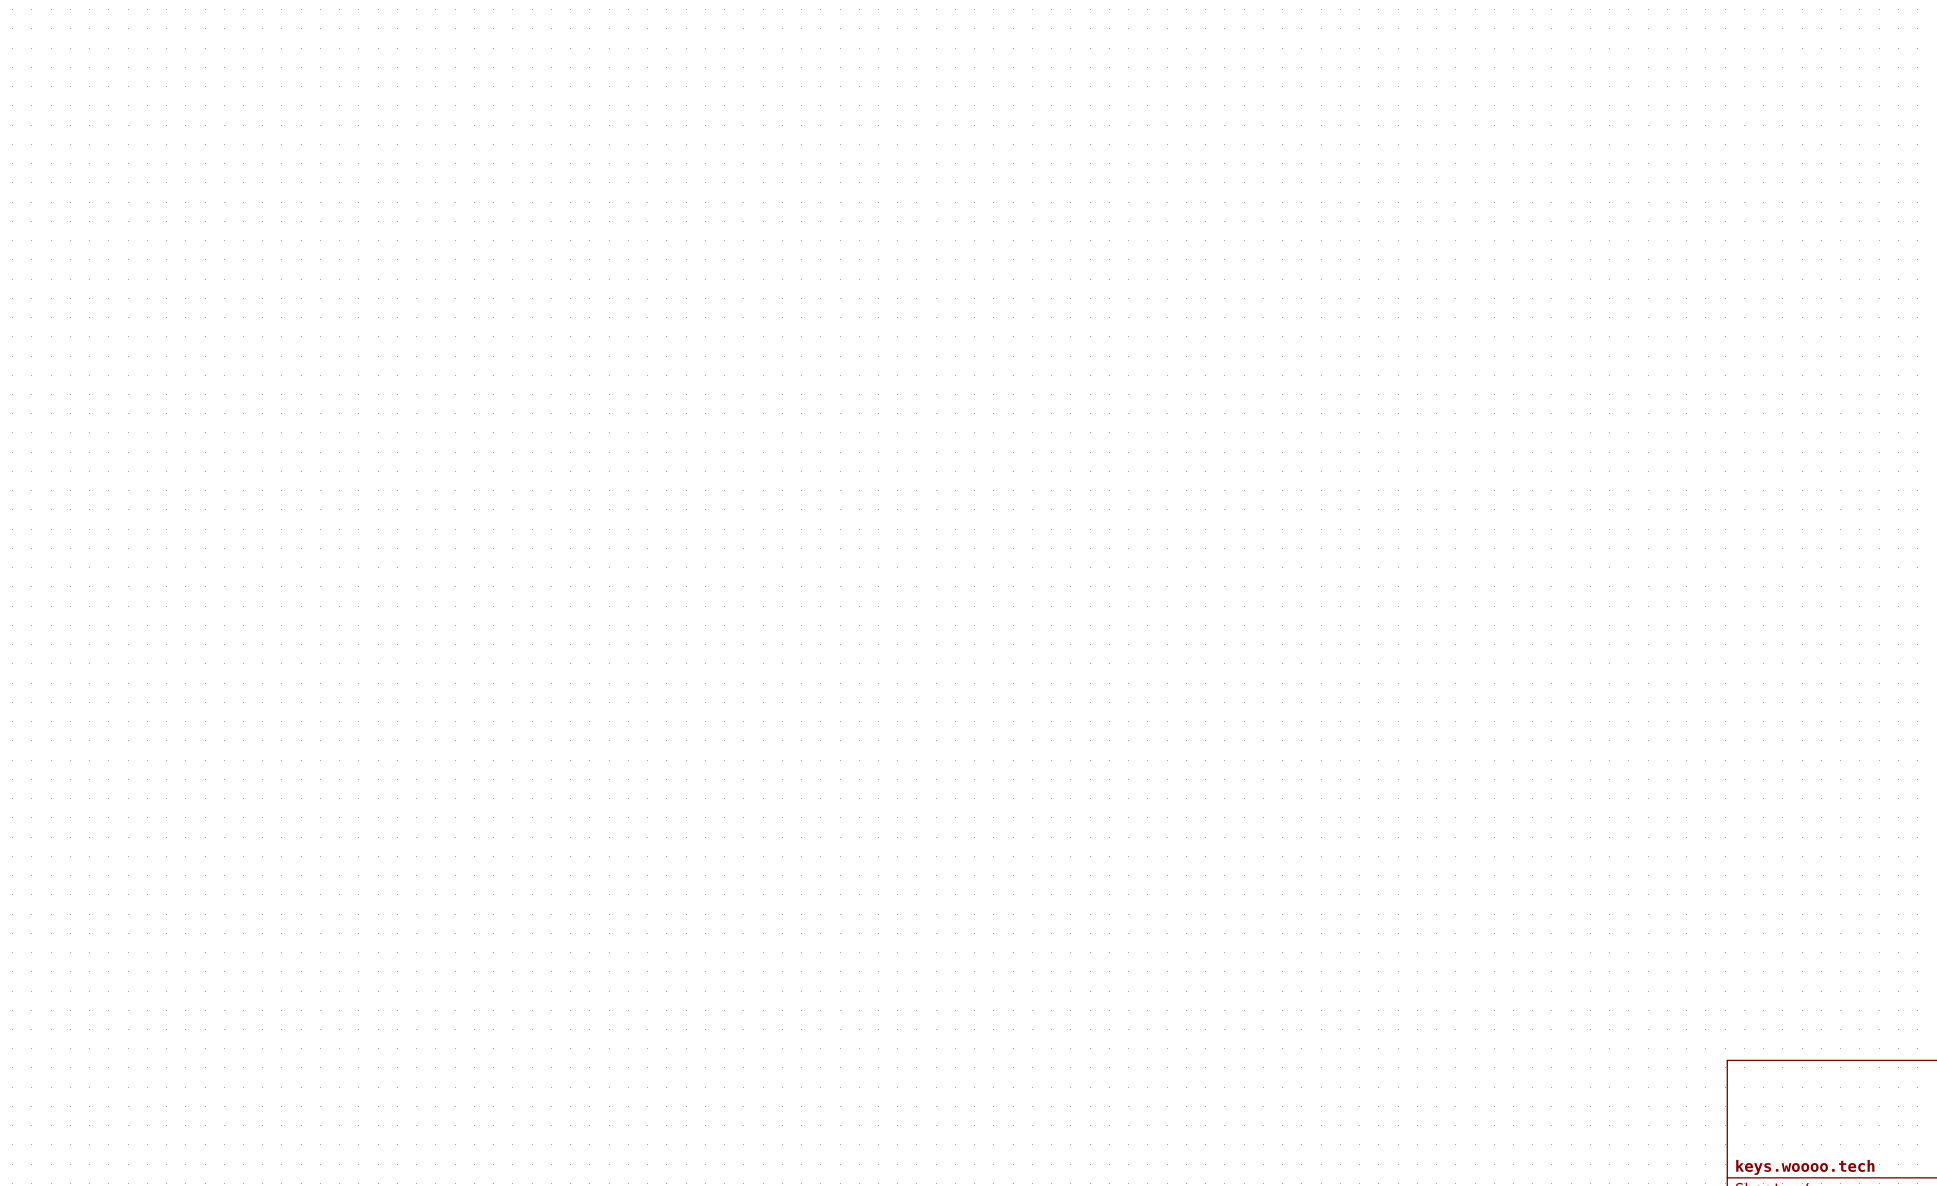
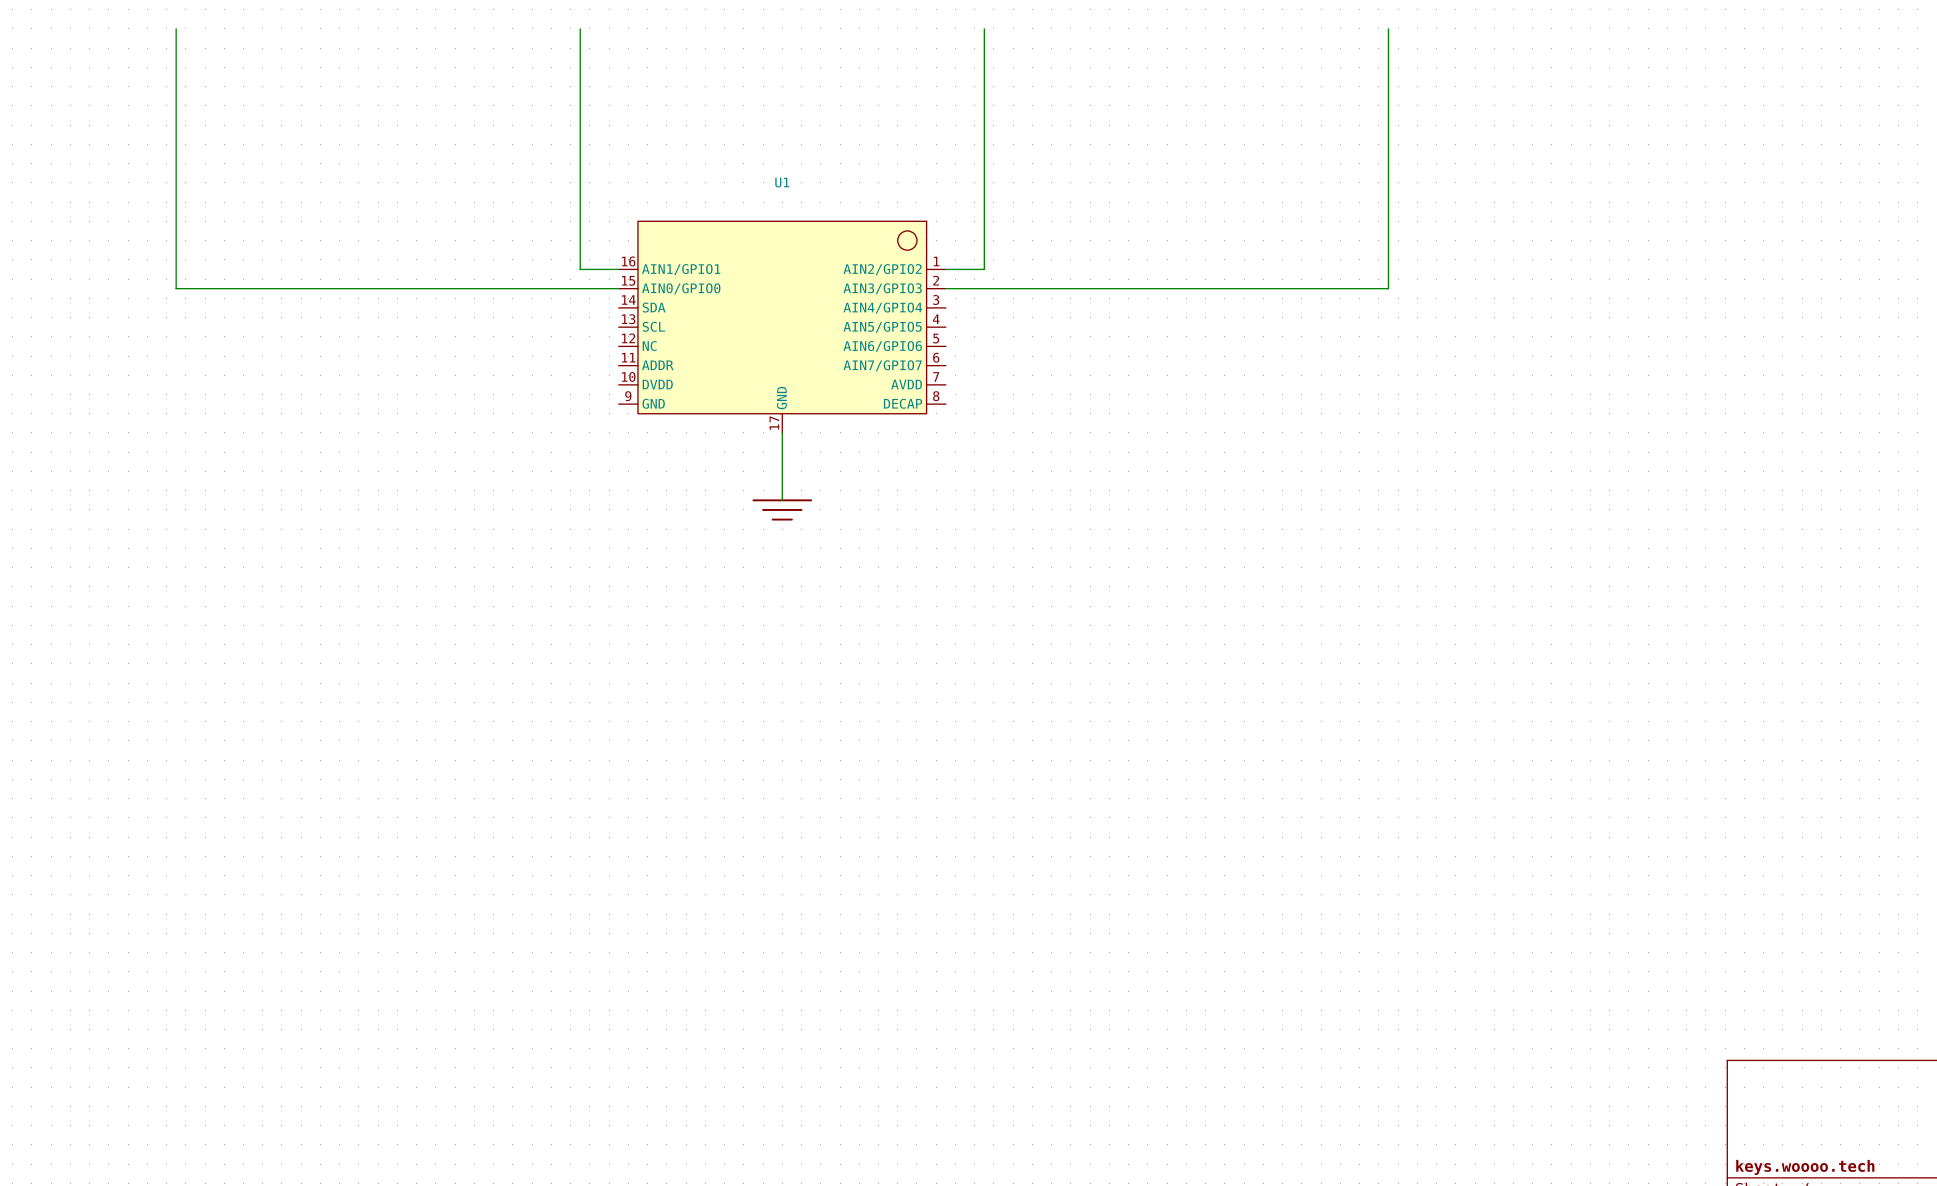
wire: none -> (176, 28) (176, 288) (618, 288)
wire: none -> (580, 28) (580, 269) (618, 269)
wire: none -> (984, 28) (984, 269) (945, 269)
wire: none -> (1388, 28) (1388, 288) (945, 288)
U1: none -> (782, 327)
wire: none -> (782, 432) (782, 500)
power symbol: none -> (782, 509)

